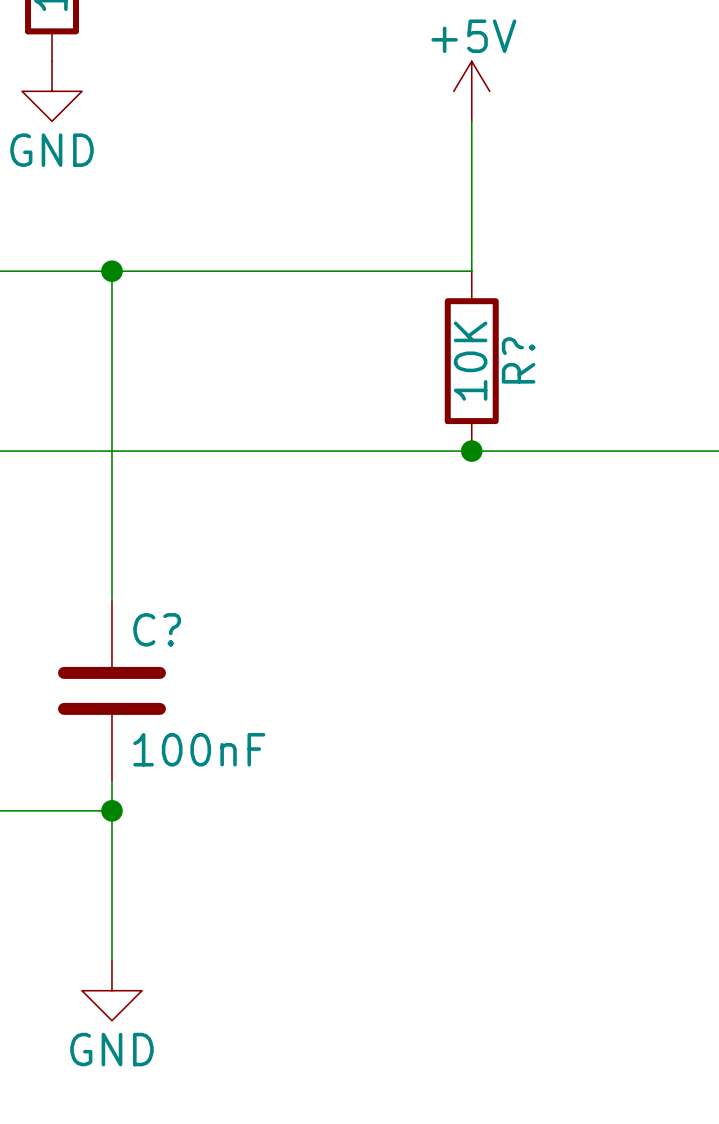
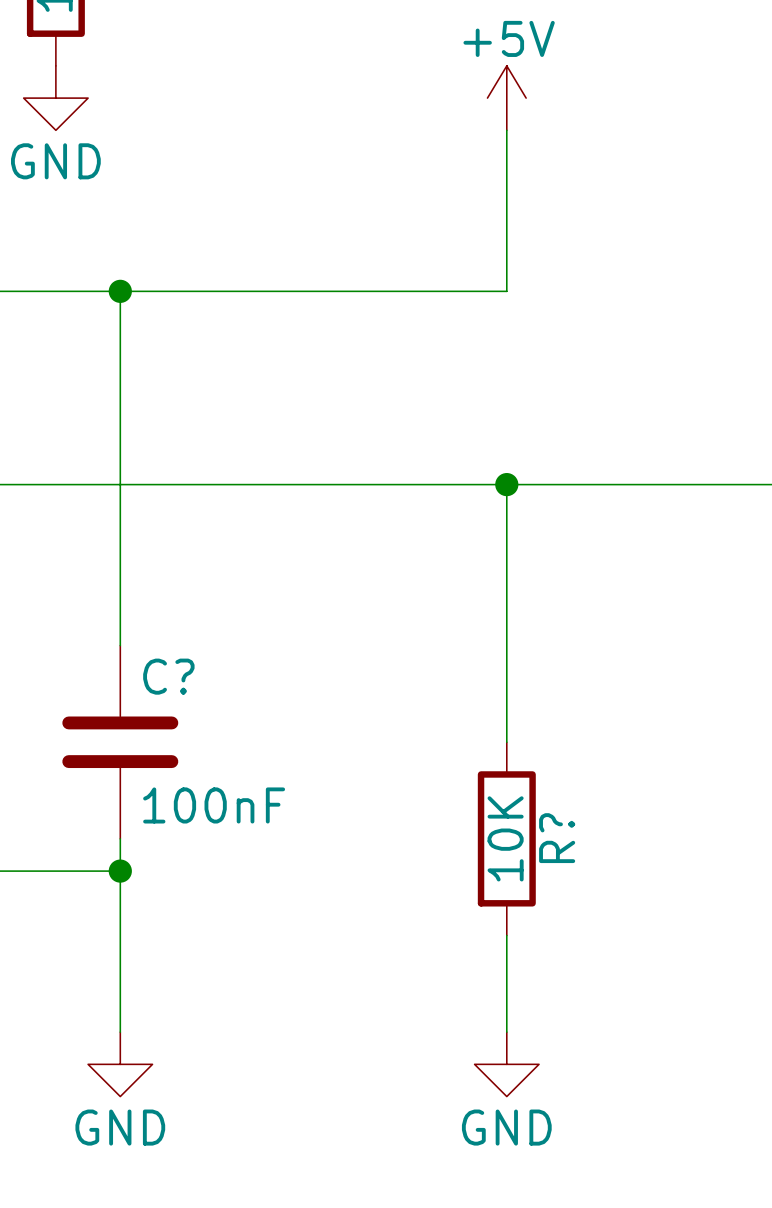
R? position: (471, 361) -> (506, 838)
wire: none -> (506, 484) (506, 742)
wire: none -> (506, 935) (506, 1032)
power symbol: none -> GND (506, 1064)

